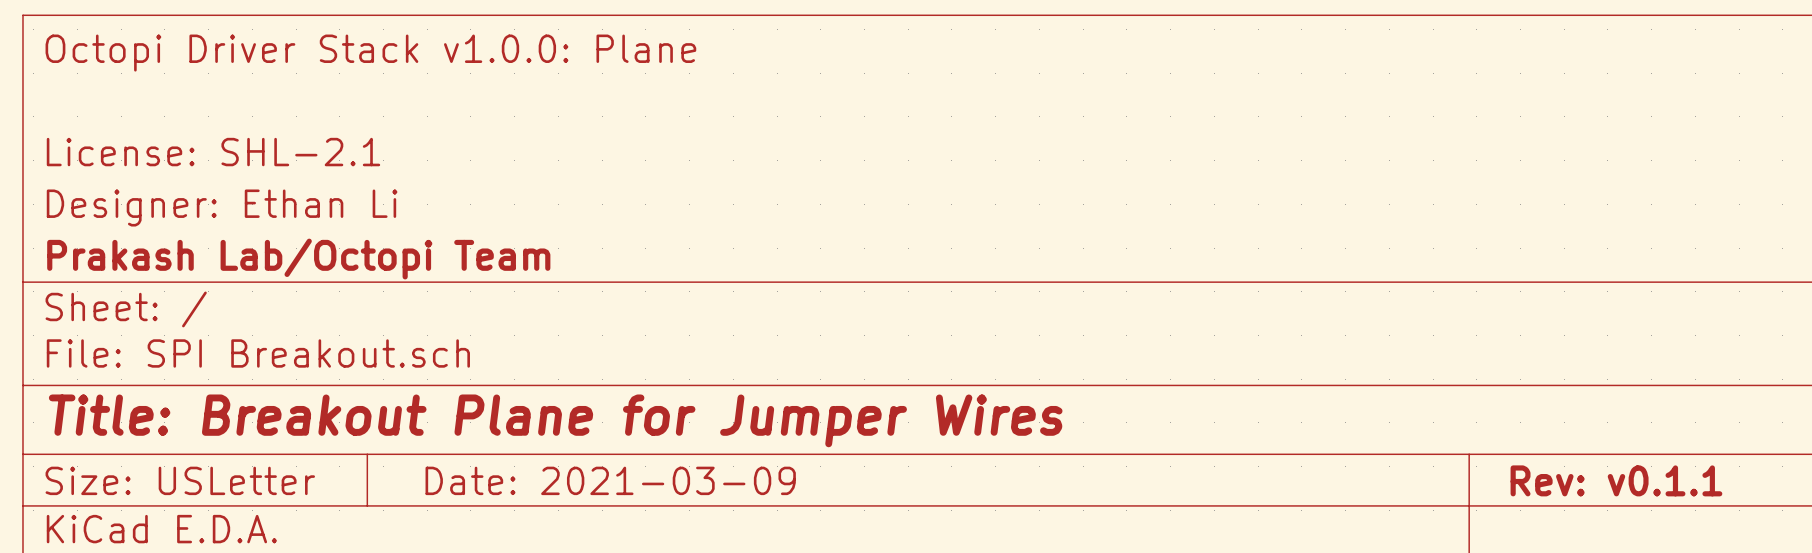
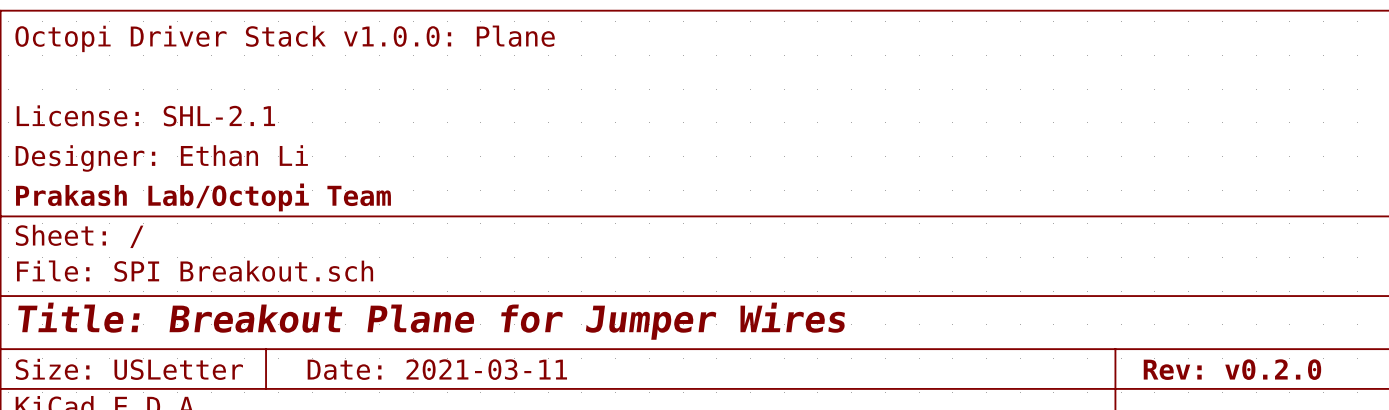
title block: Date: 2021-03-09 (610, 480) -> Date: 2021-03-11 (437, 369)
title block: Rev: v0.1.1 (1616, 480) -> Rev: v0.2.0 (1232, 369)

